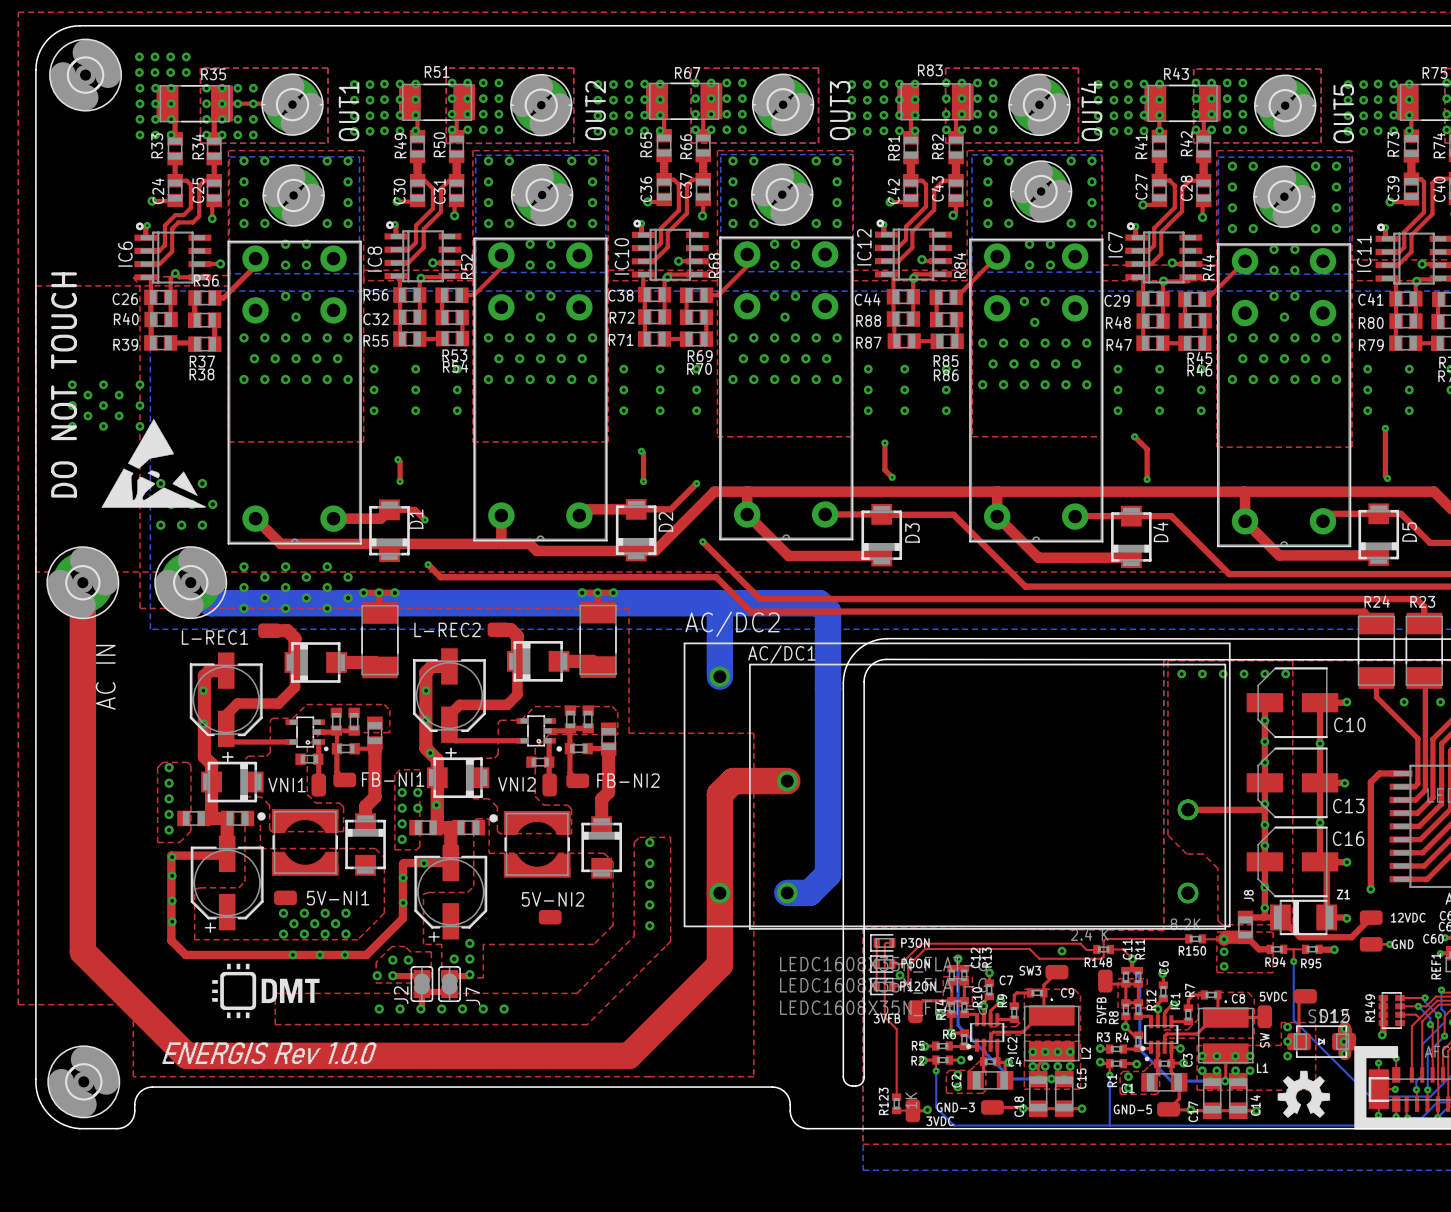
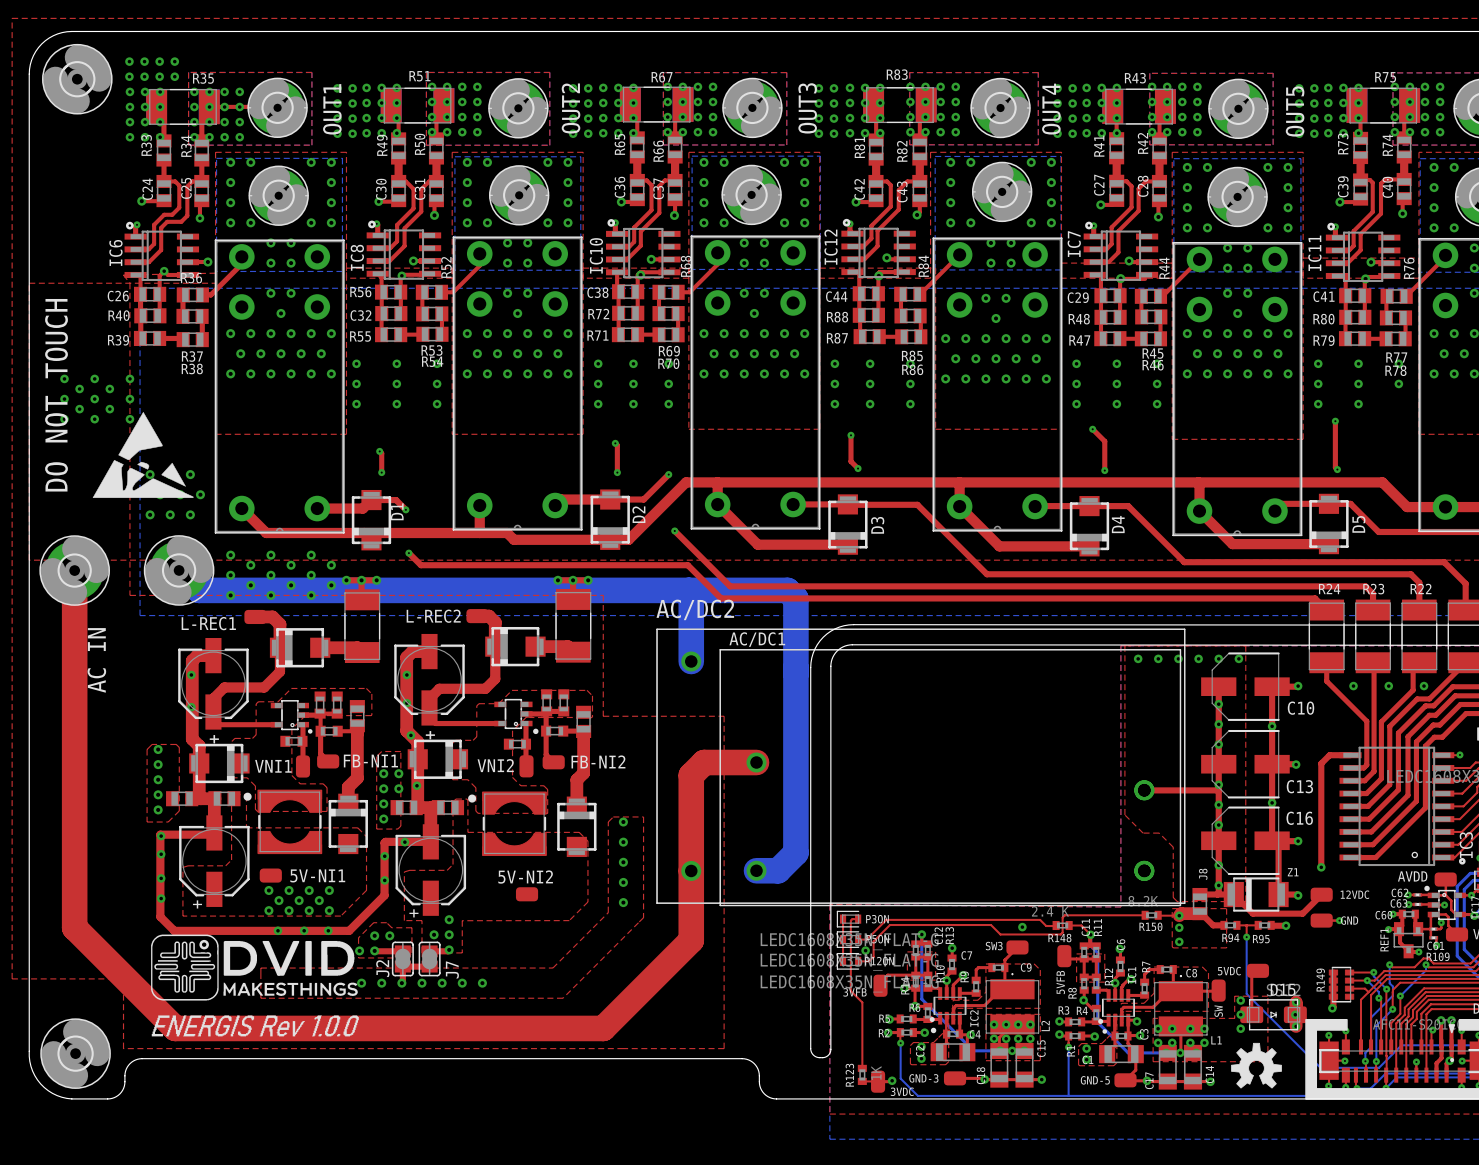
drawing: none -> [151, 934, 358, 1001]
drawing: [212, 963, 320, 1019] -> none

